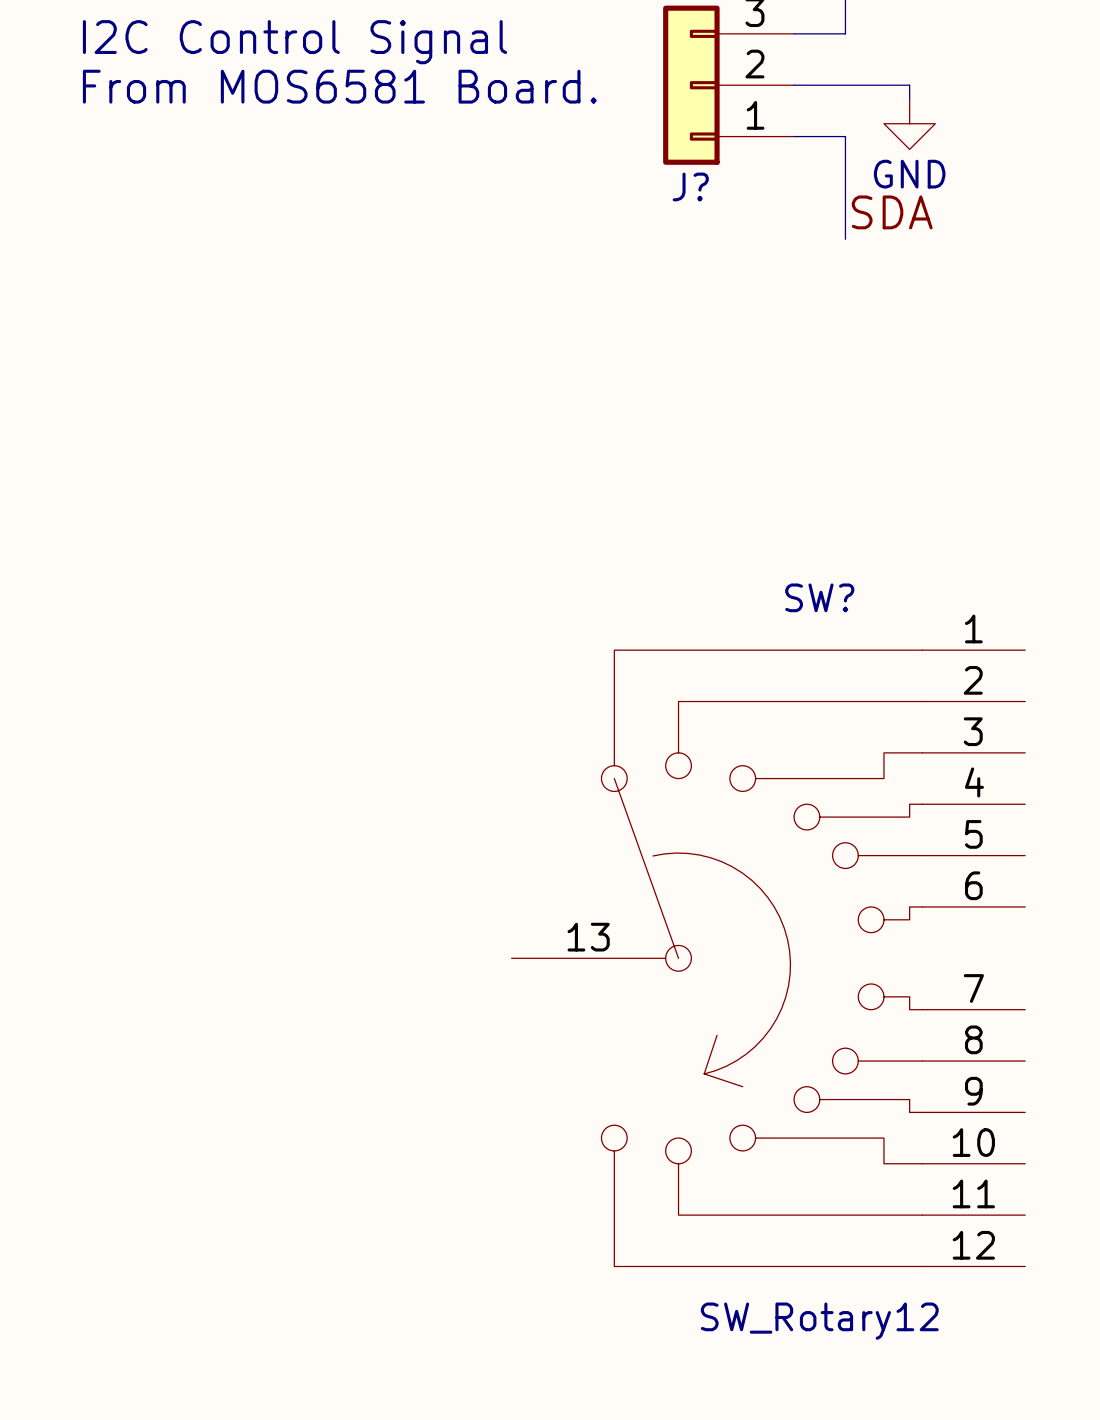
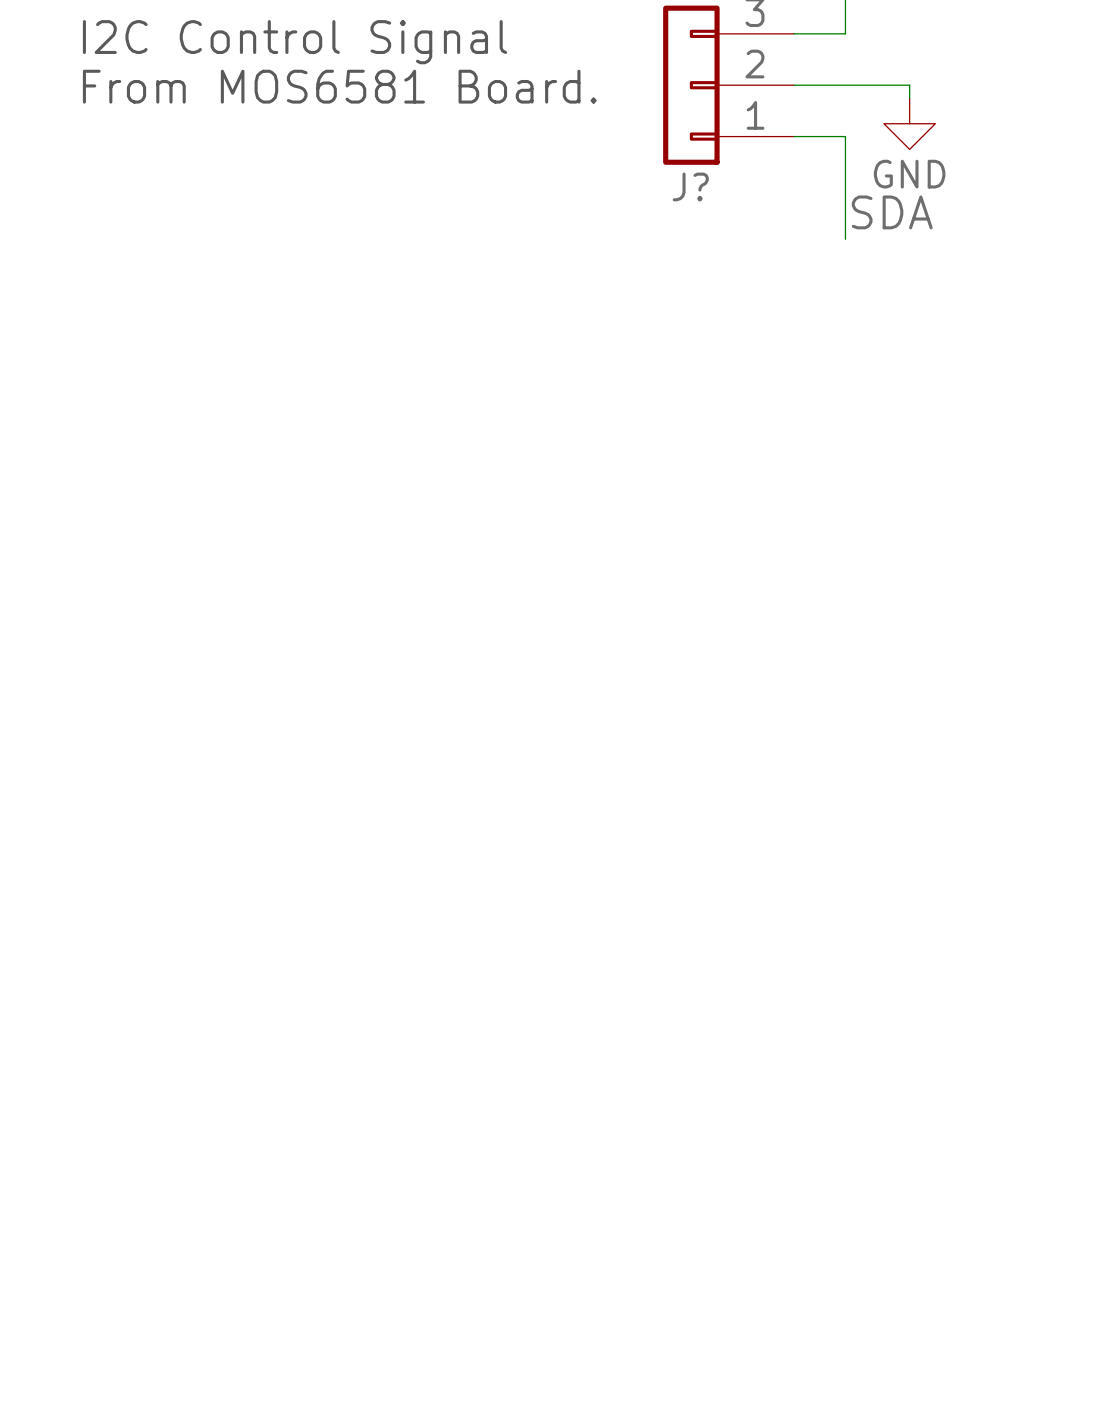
SW?: SW_Rotary12 (768, 958) -> none

